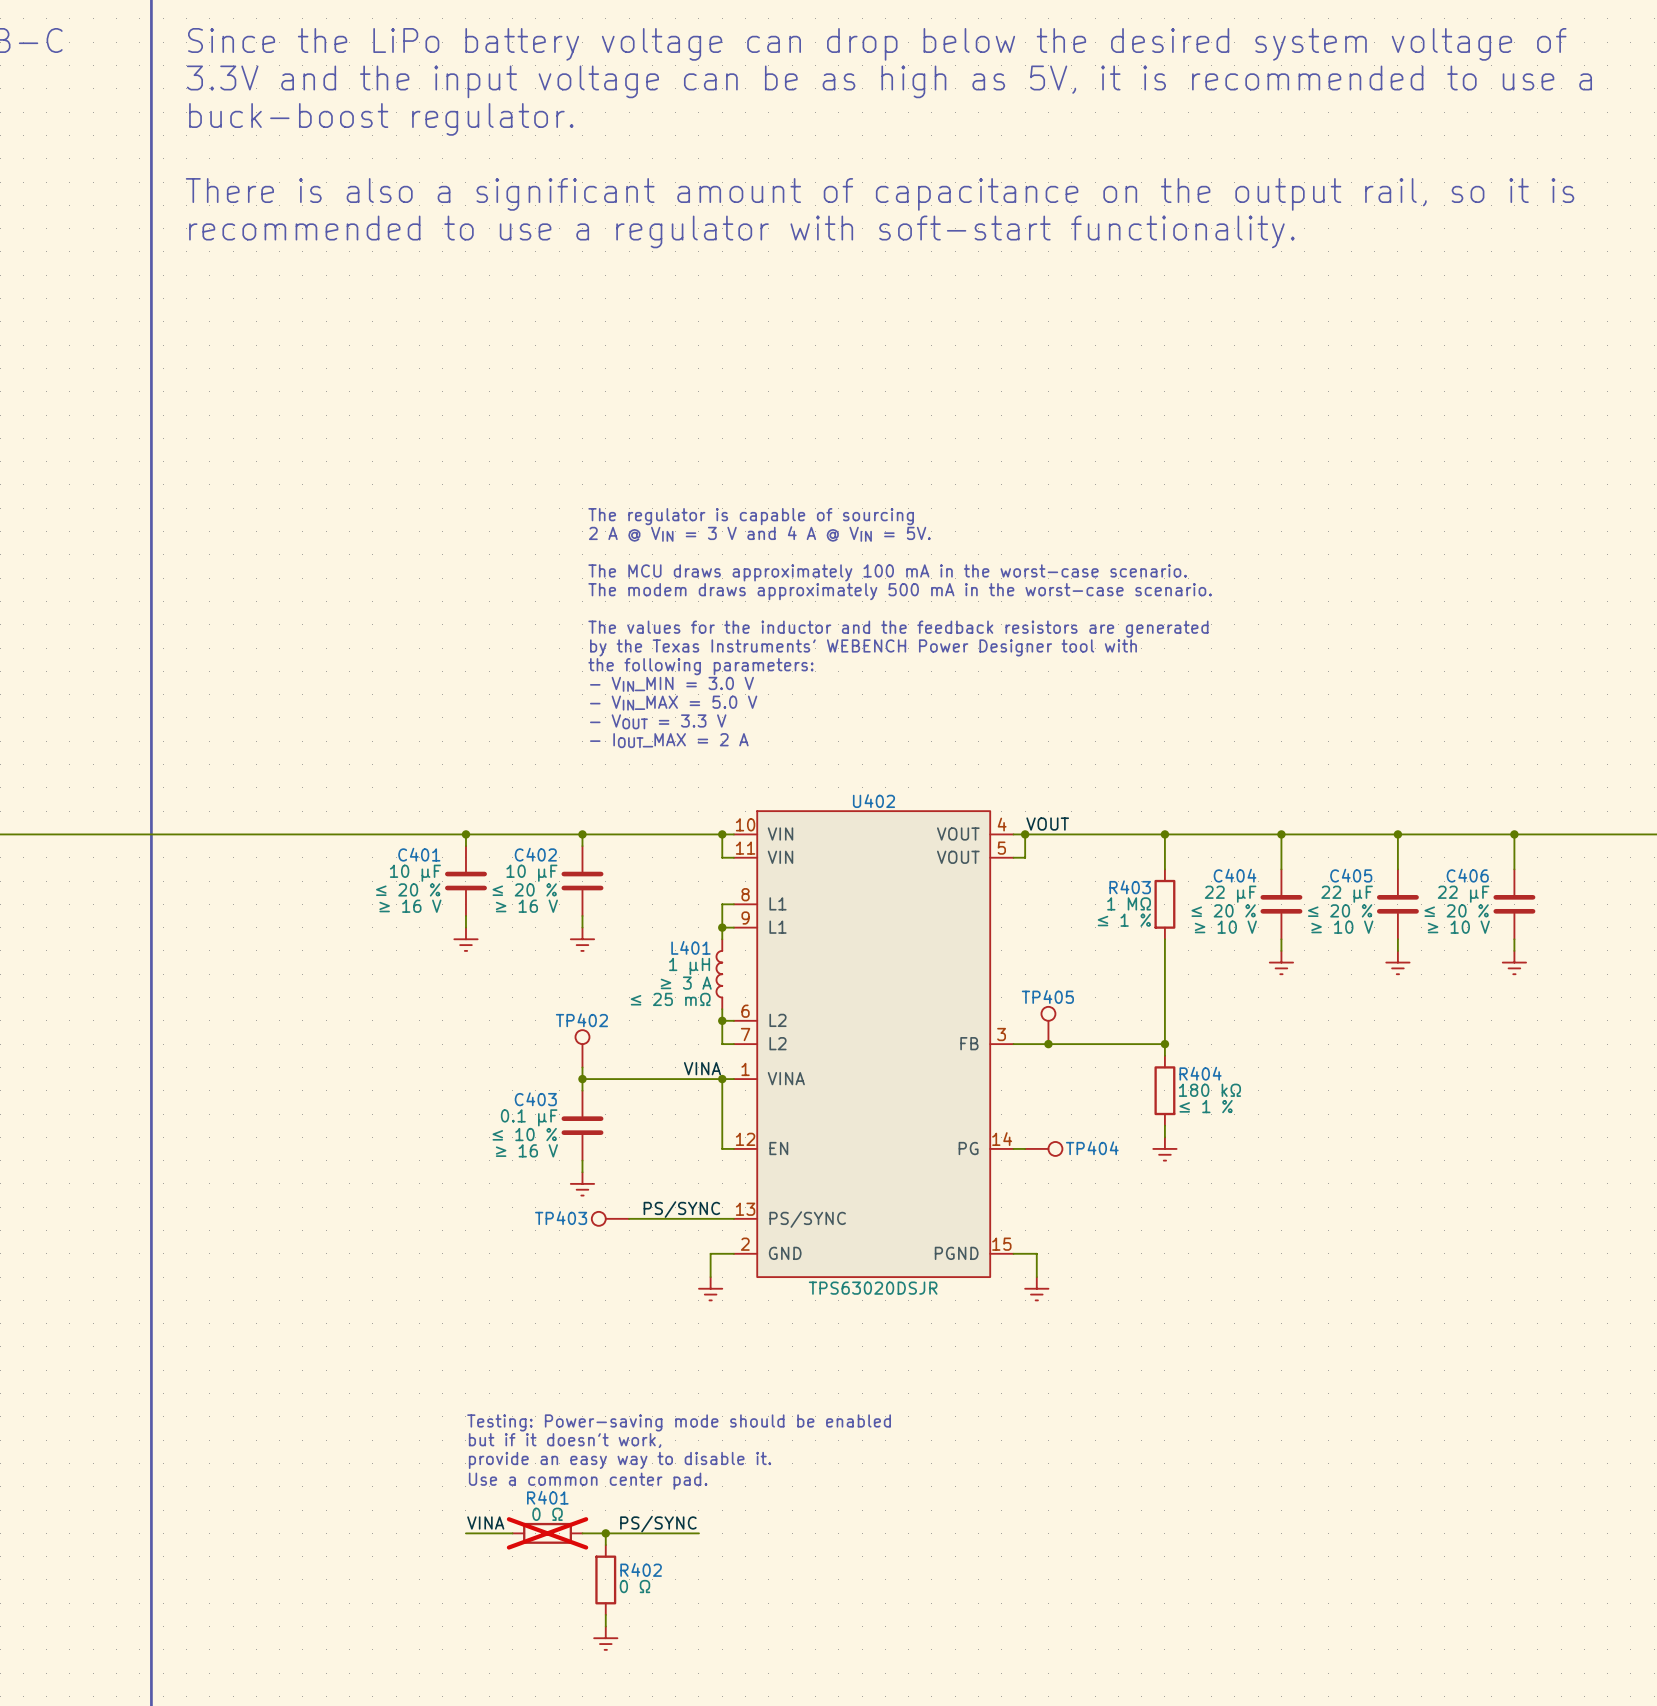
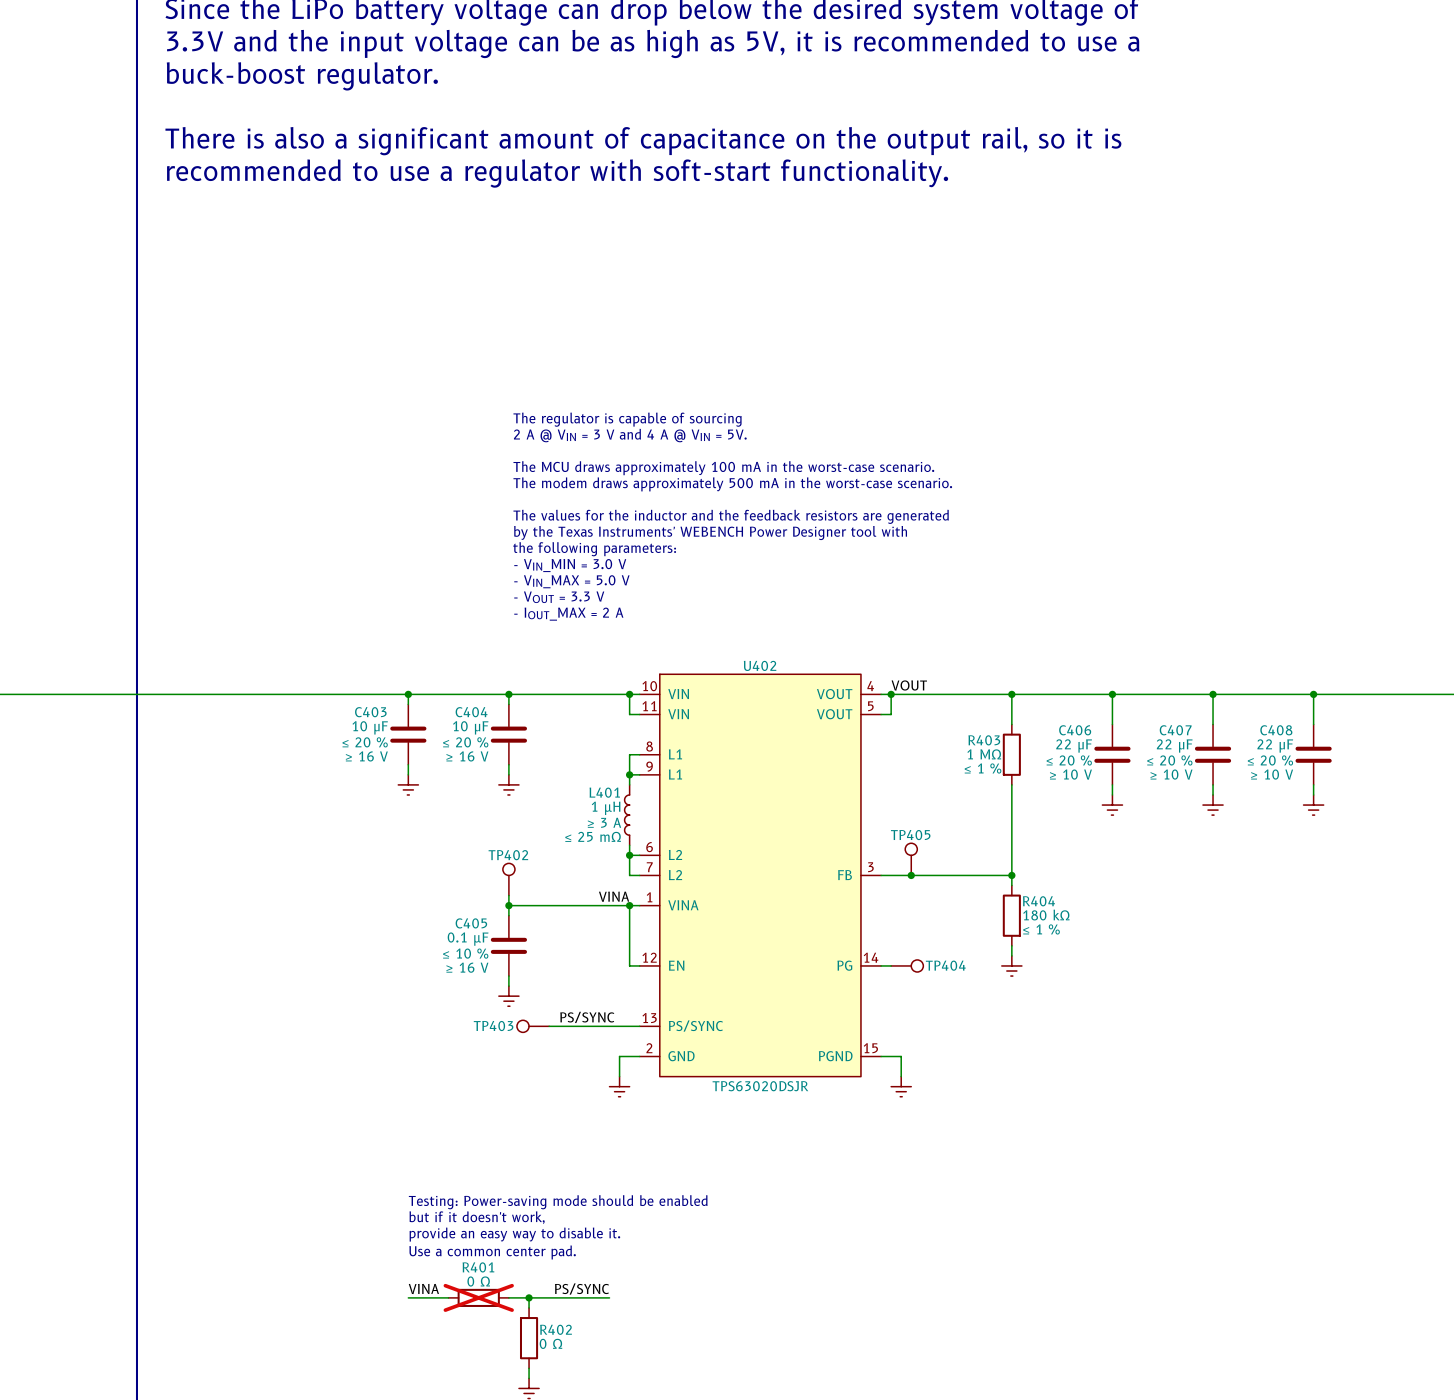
C401 name: C401 (419, 854) -> C403 (370, 712)
C402 name: C402 (535, 854) -> C404 (471, 712)
C404 name: C404 (1235, 875) -> C406 (1075, 730)
C405 name: C405 (1351, 875) -> C407 (1175, 730)
C406 name: C406 (1467, 875) -> C408 (1276, 730)
C403 name: C403 (535, 1099) -> C405 (471, 923)

